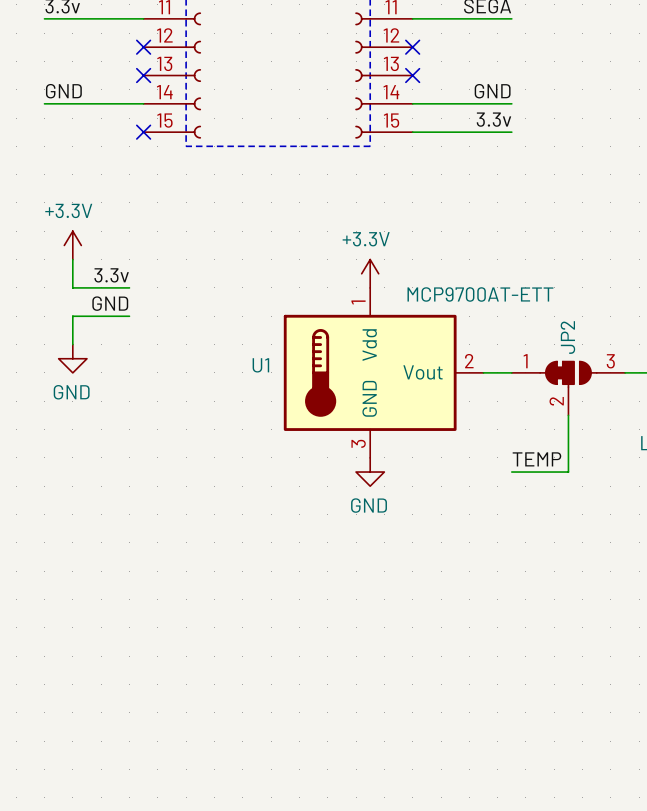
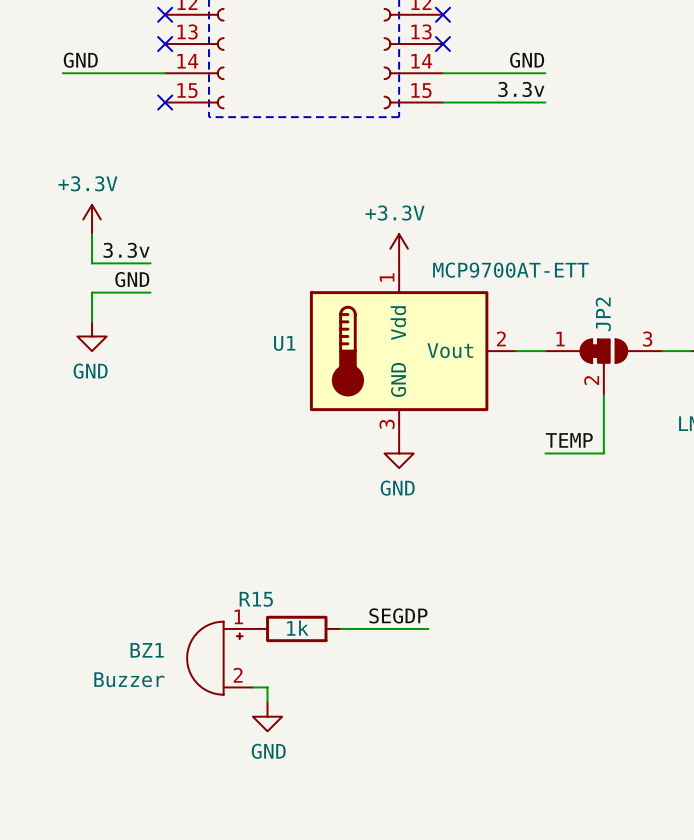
label: none -> SEGDP (398, 615)
R15: none -> 1k (296, 628)
wire: none -> (340, 628) (428, 628)
BZ1: none -> Buzzer (219, 658)
wire: none -> (252, 687) (267, 687) (267, 702)
power symbol: none -> GND (267, 716)

